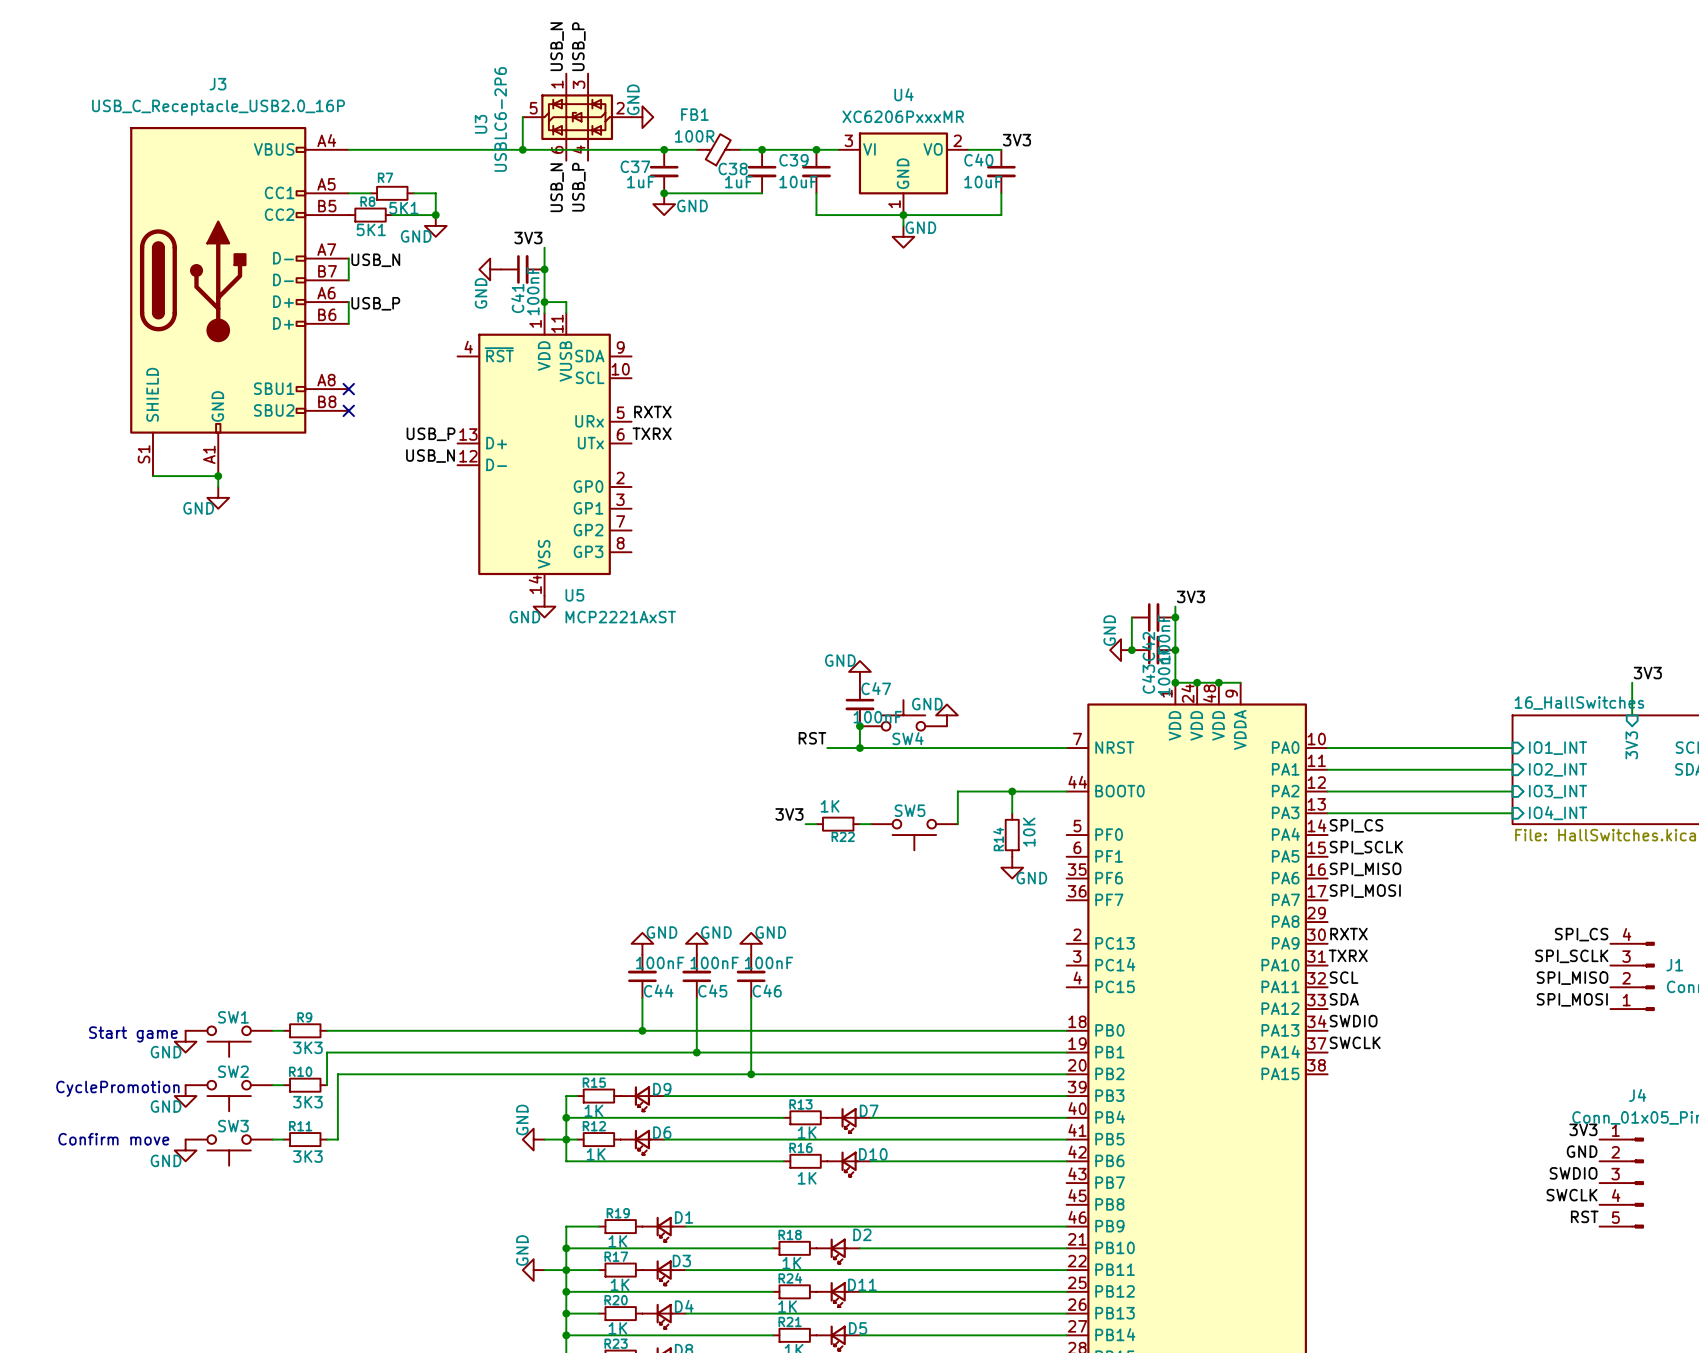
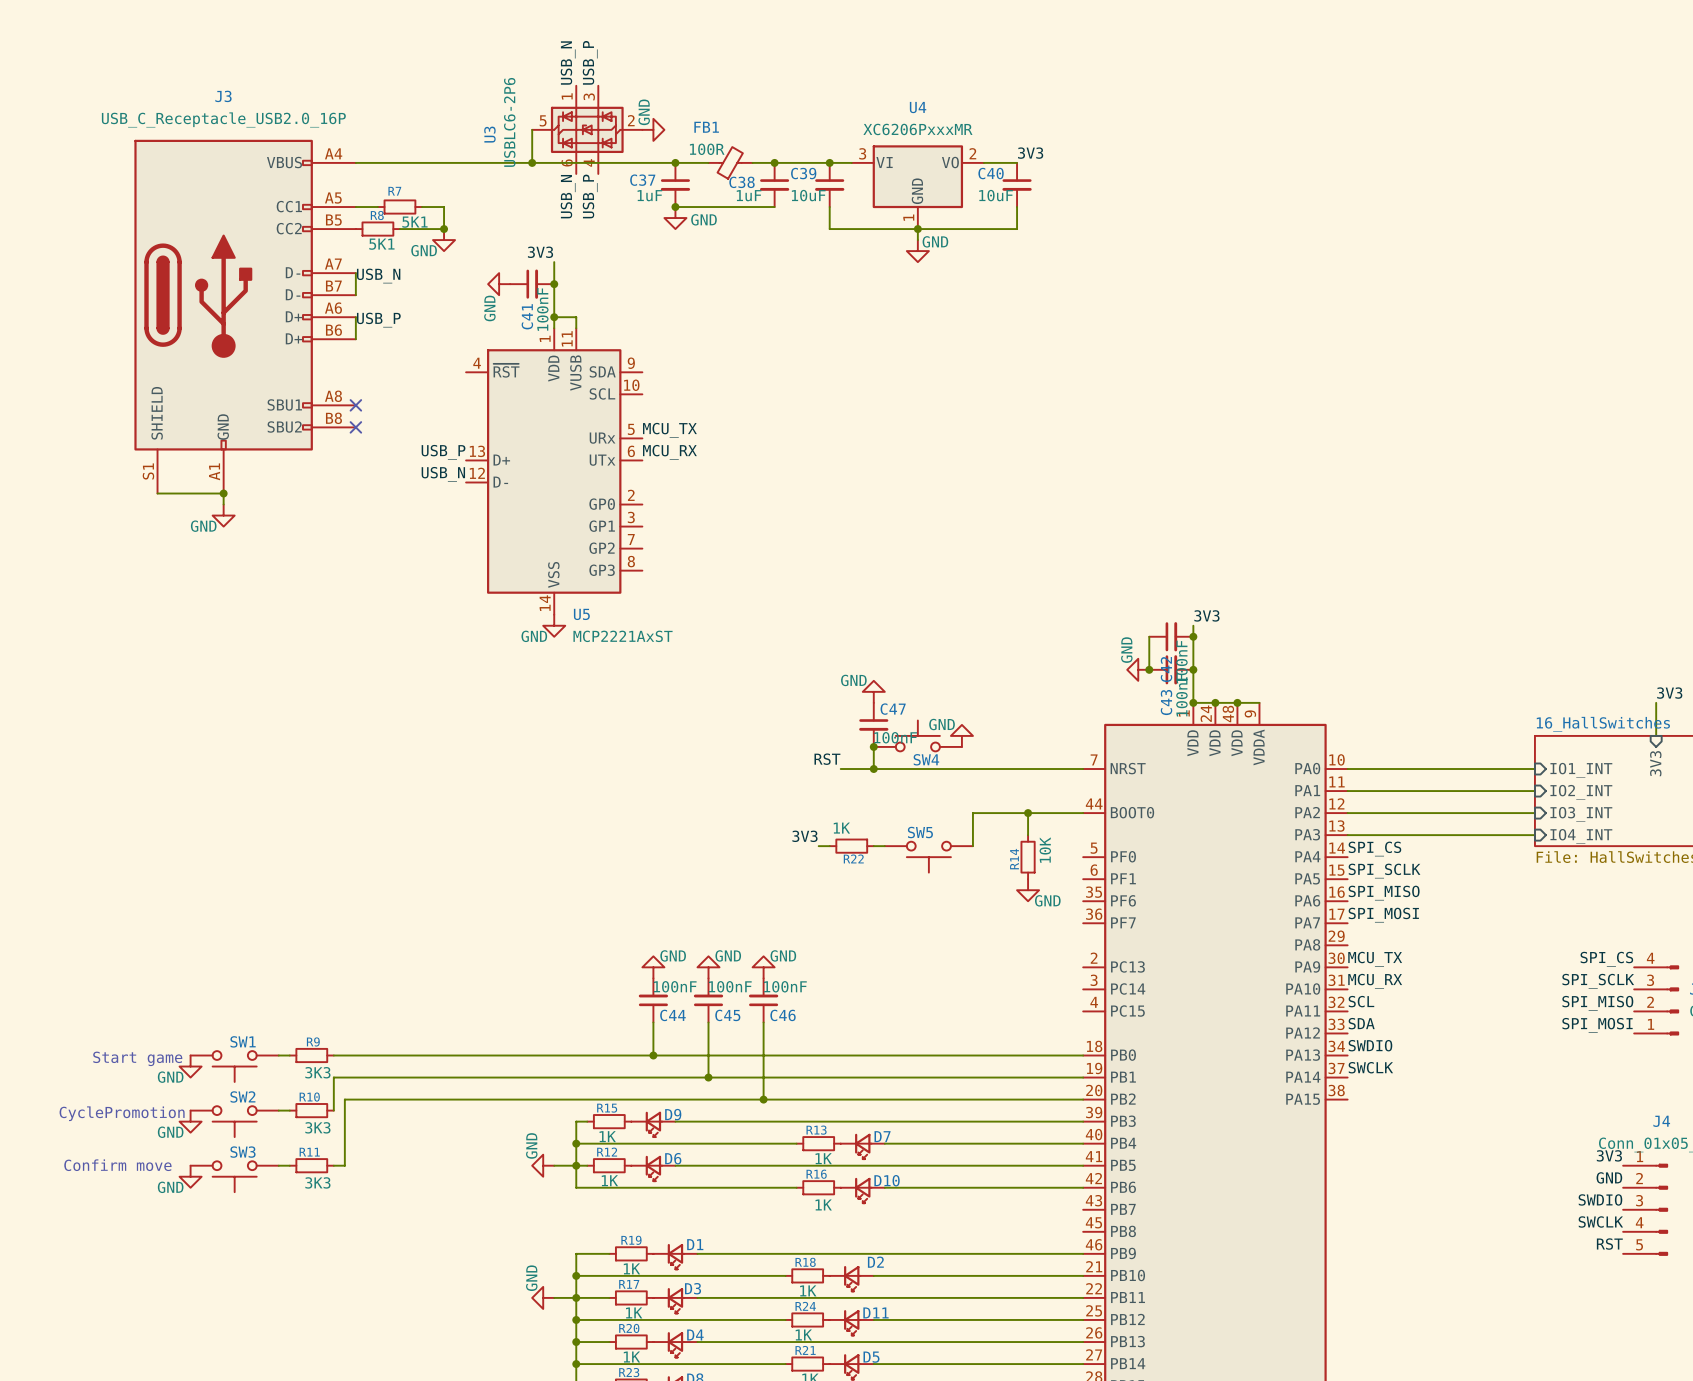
label: RXTX (652, 412) -> MCU_TX (669, 430)
label: TXRX (652, 433) -> MCU_RX (669, 452)
label: RXTX (1348, 934) -> MCU_TX (1375, 959)
label: TXRX (1348, 955) -> MCU_RX (1375, 981)

